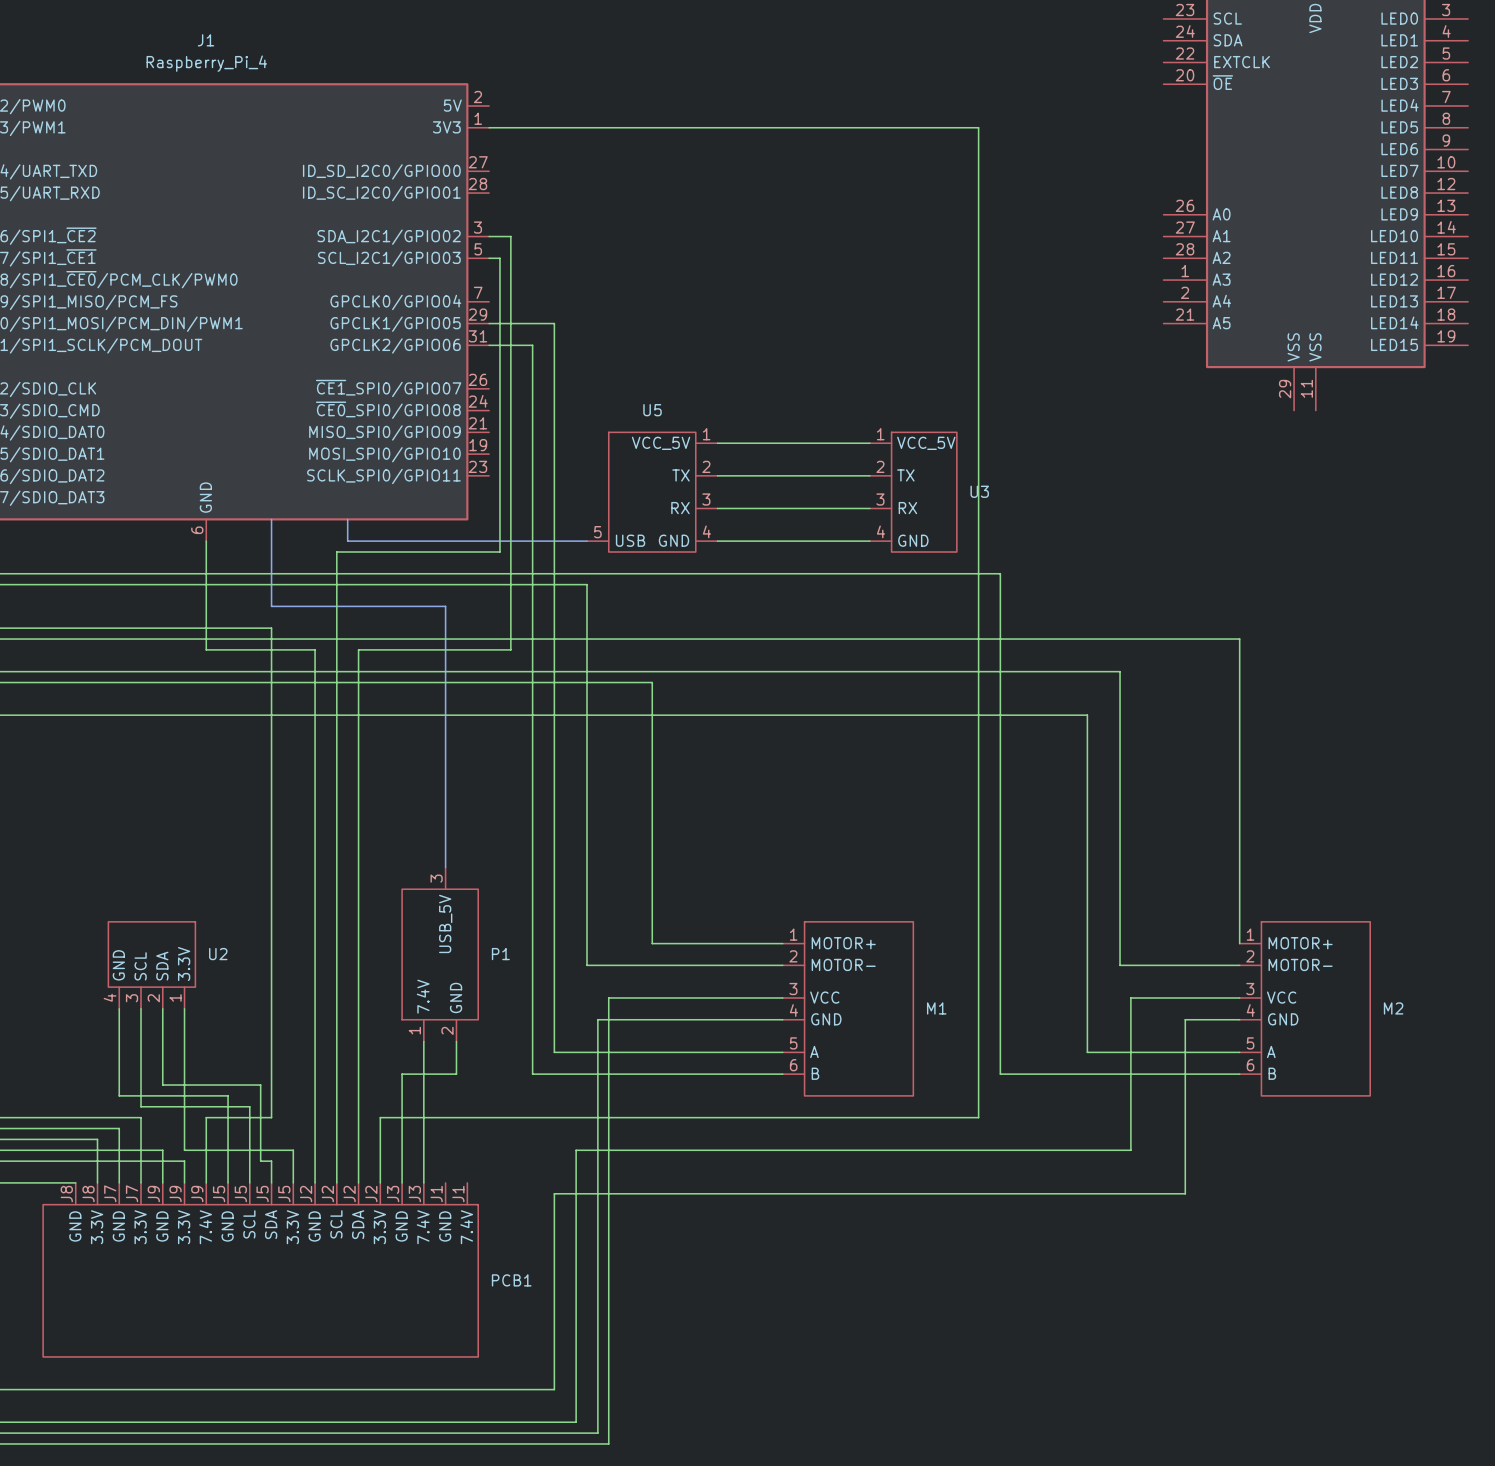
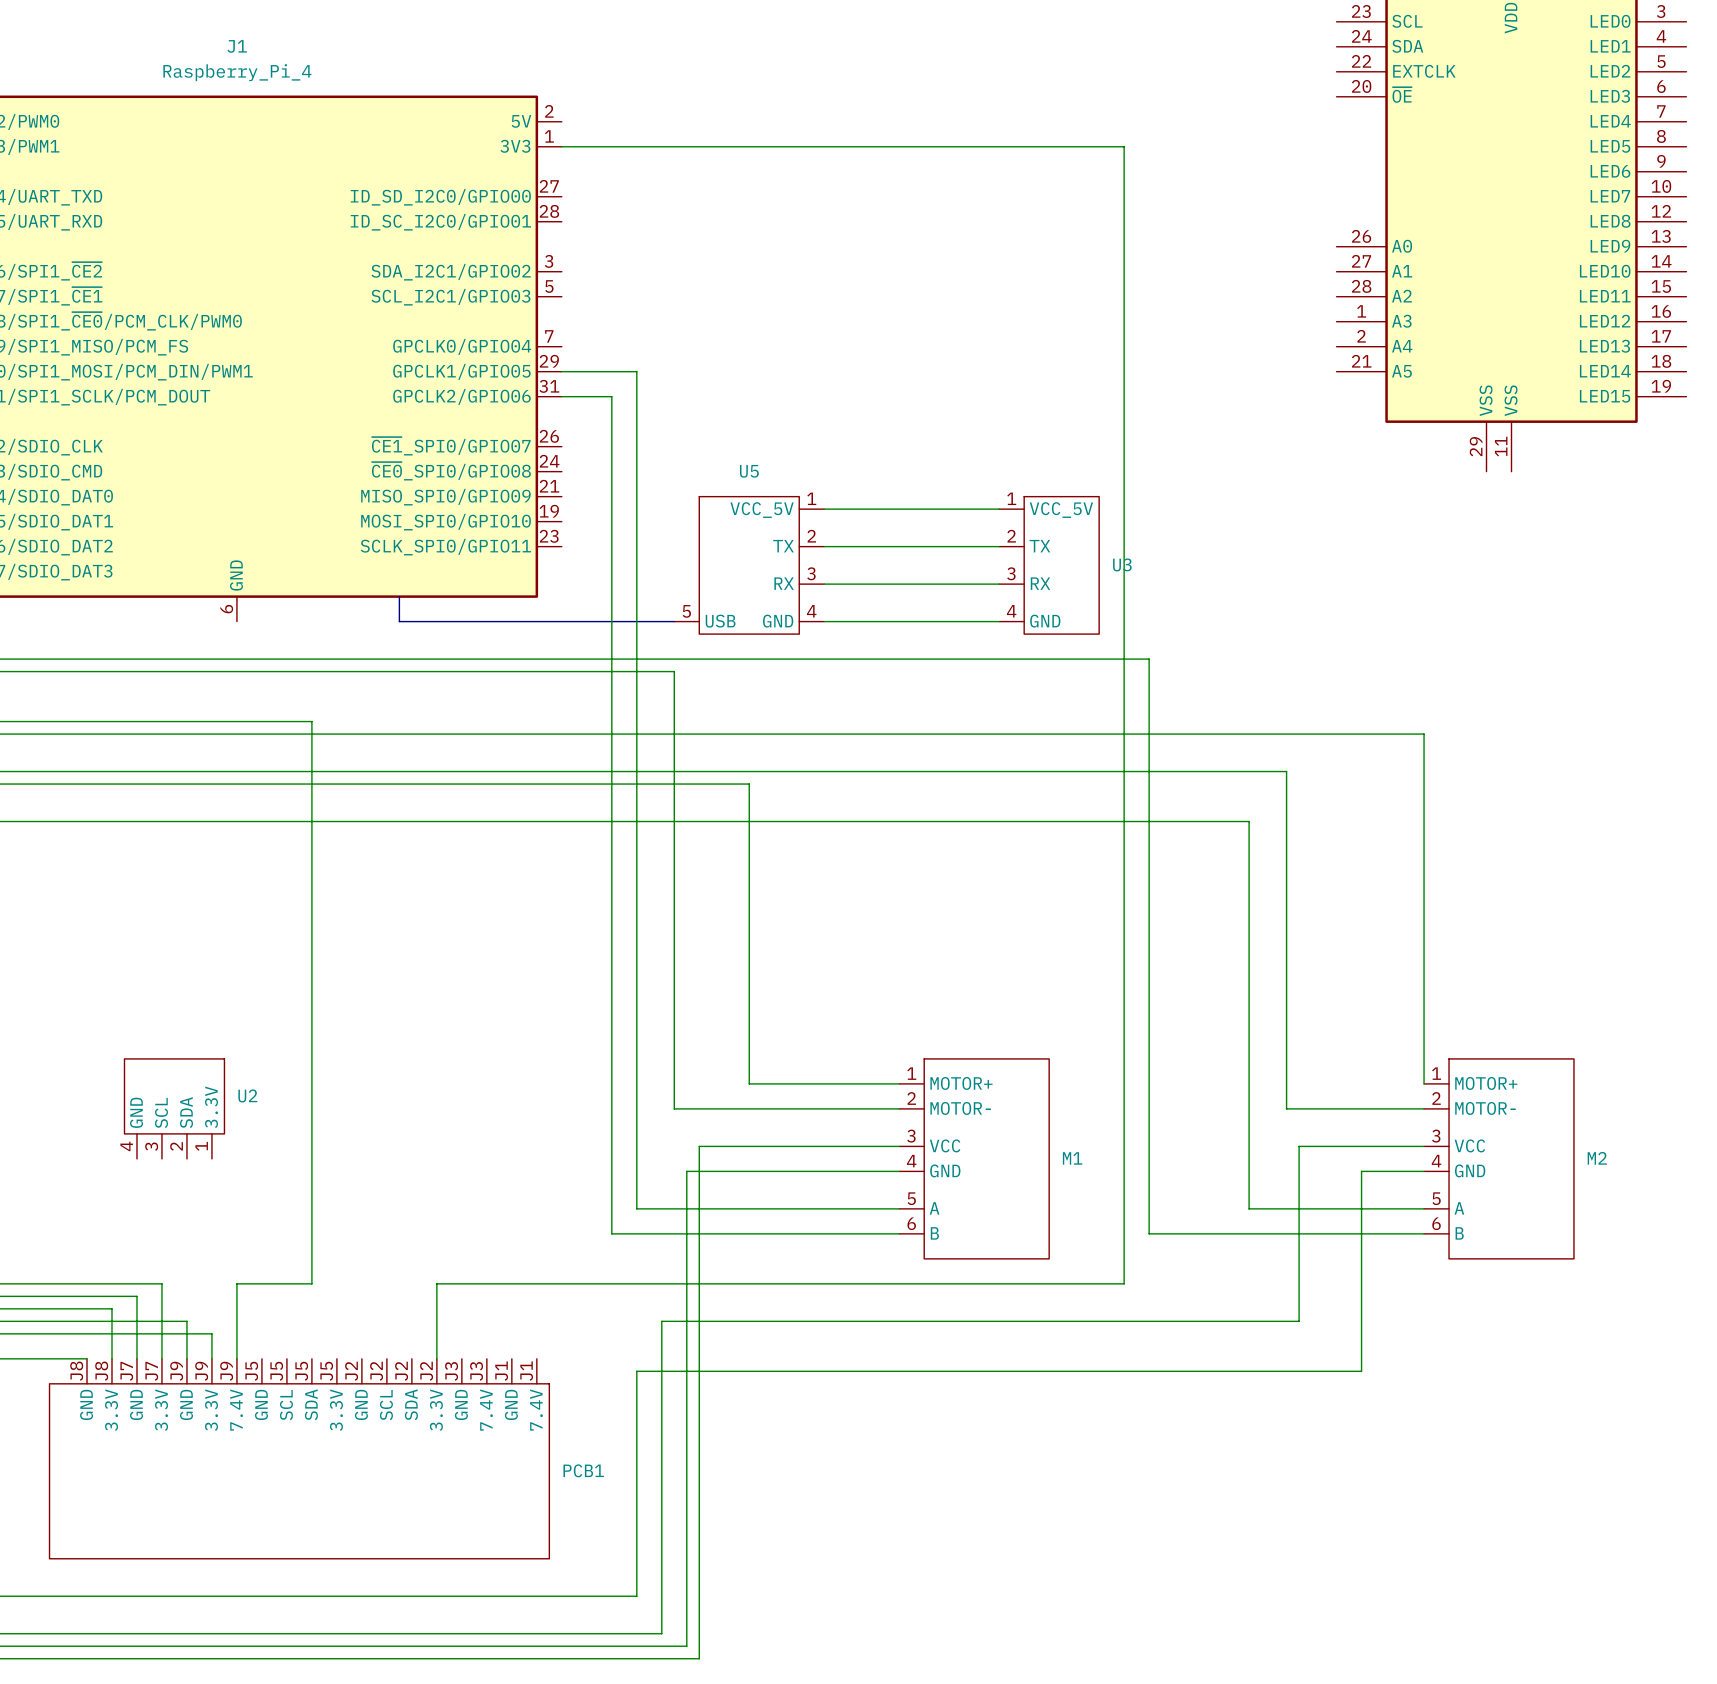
wire: (489, 236) (510, 236) (510, 649) (358, 649) (358, 1182) -> none
wire: (489, 258) (499, 258) (499, 552) (336, 552) (336, 1182) -> none
bus: (271, 519) (271, 606) (445, 606) (445, 867) -> none
wire: (206, 541) (206, 649) (315, 649) (315, 1182) -> none
P1: (440, 954) -> none
wire: (119, 1008) (119, 1095) (228, 1095) (228, 1182) -> none
wire: (141, 1008) (141, 1106) (249, 1106) (249, 1182) -> none
wire: (162, 1008) (162, 1085) (260, 1085) (260, 1161) (271, 1161) (271, 1182) -> none
wire: (184, 1008) (184, 1150) (293, 1150) (293, 1182) -> none
wire: (423, 1041) (423, 1182) -> none
wire: (456, 1041) (456, 1074) (402, 1074) (402, 1182) -> none

